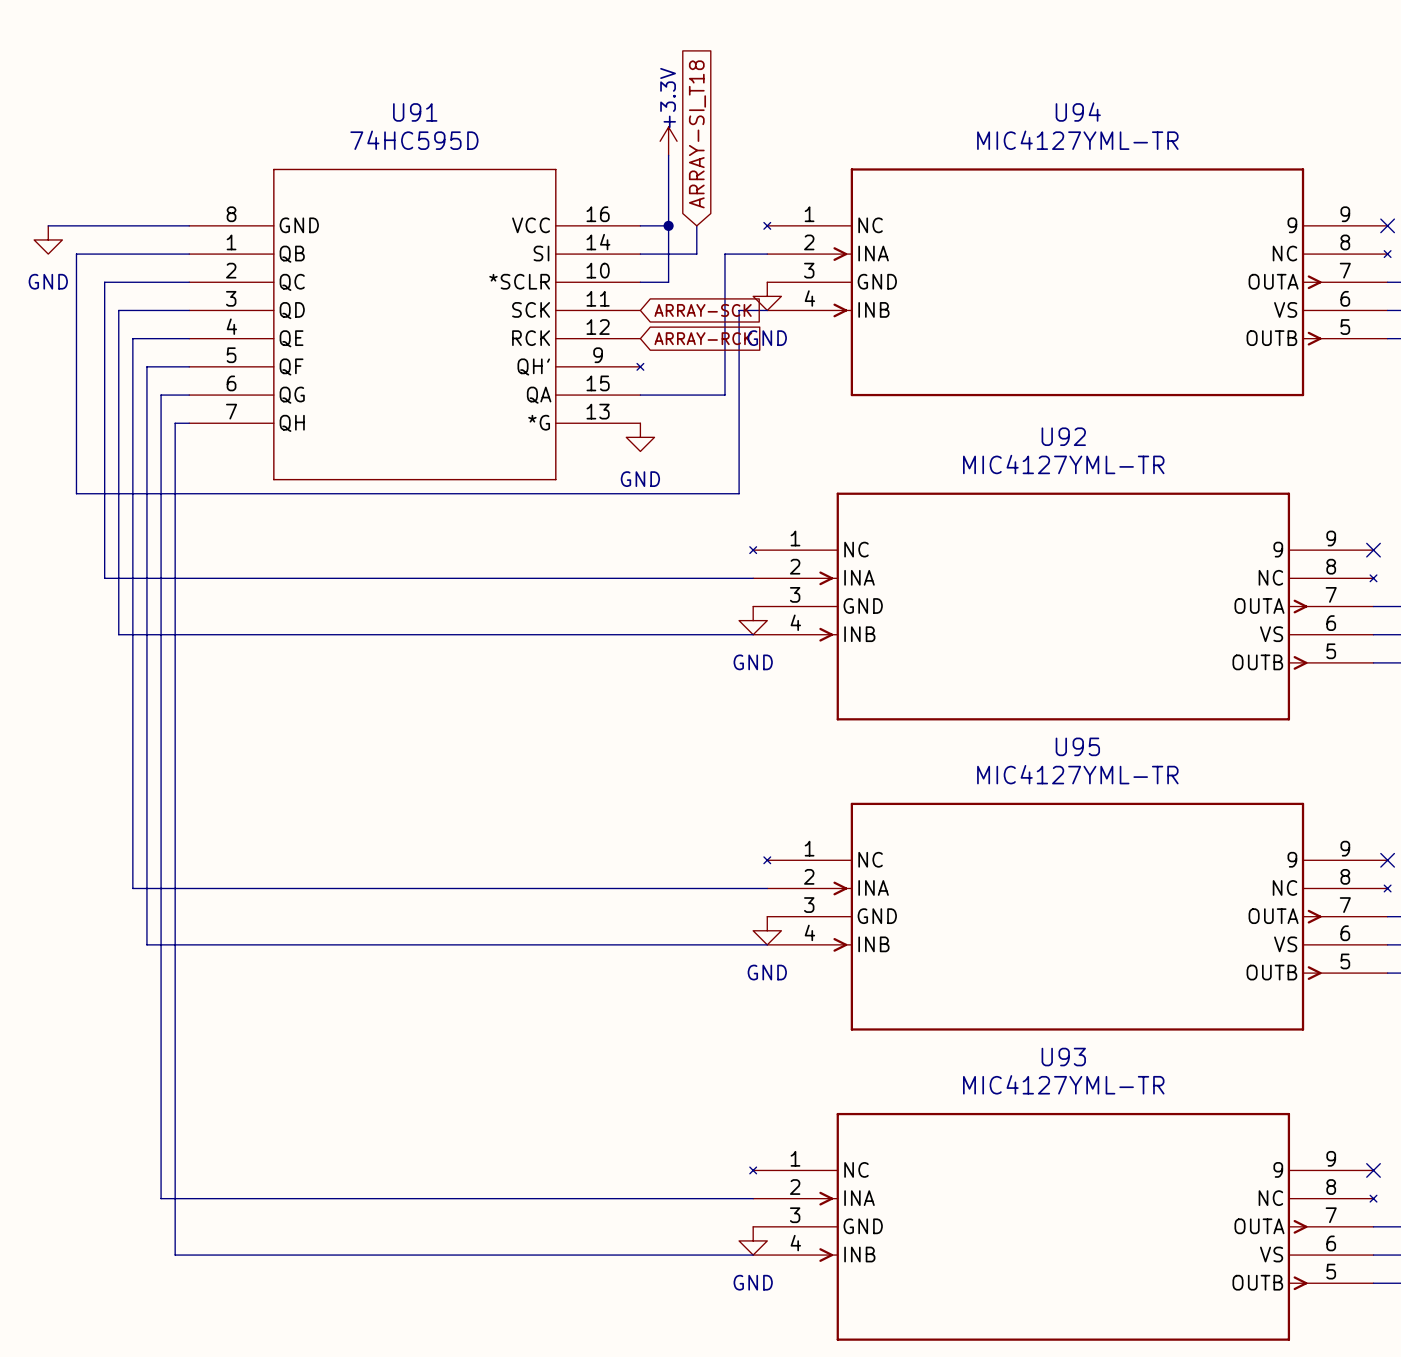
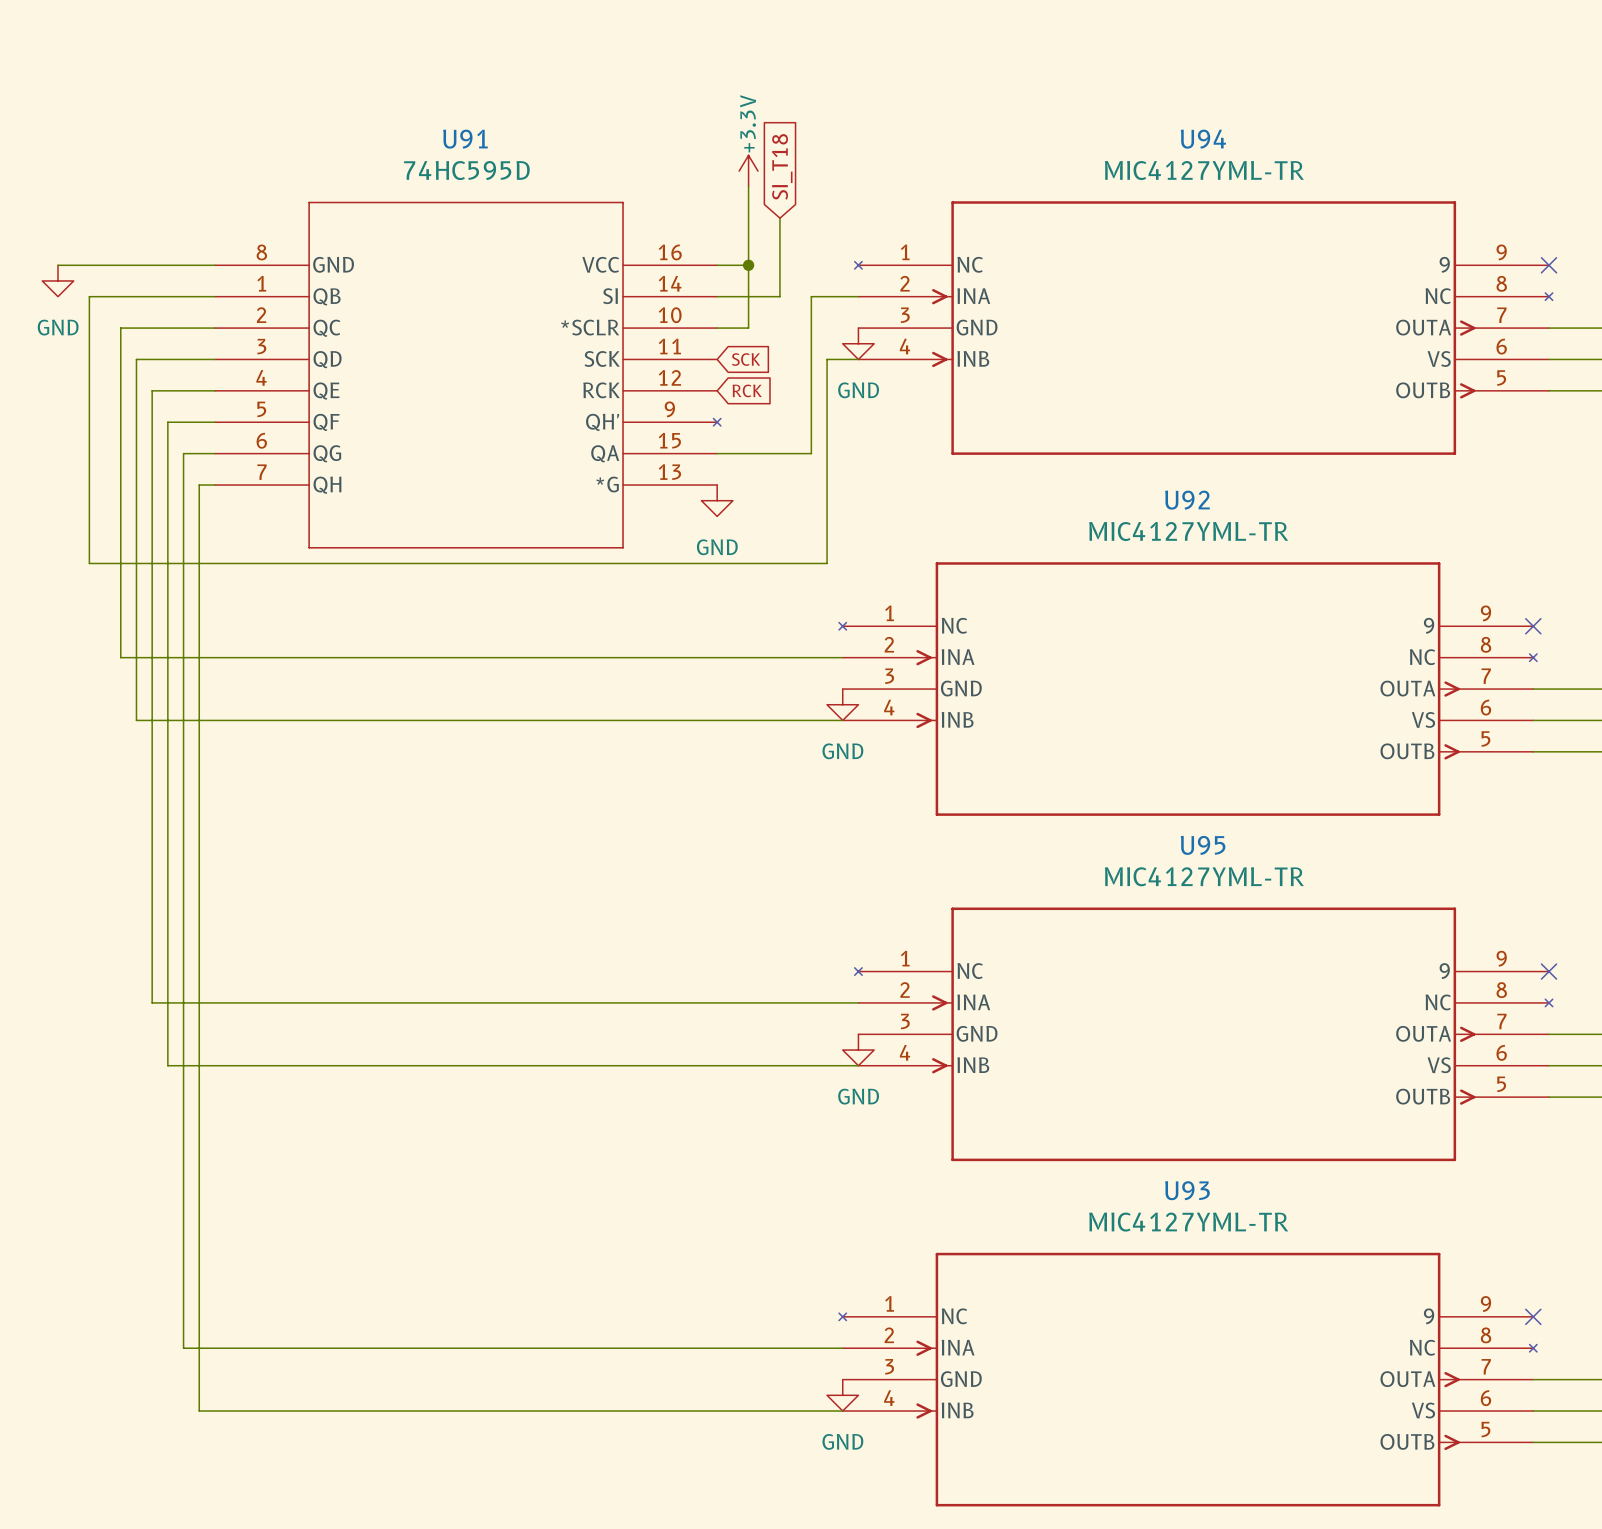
global label: ARRAY-SI_T18 (697, 134) -> SI_T18 (782, 166)
wire: none -> (779, 218) (779, 265)
global label: ARRAY-SCK (703, 310) -> SCK (746, 359)
global label: ARRAY-RCK (703, 338) -> RCK (747, 390)

